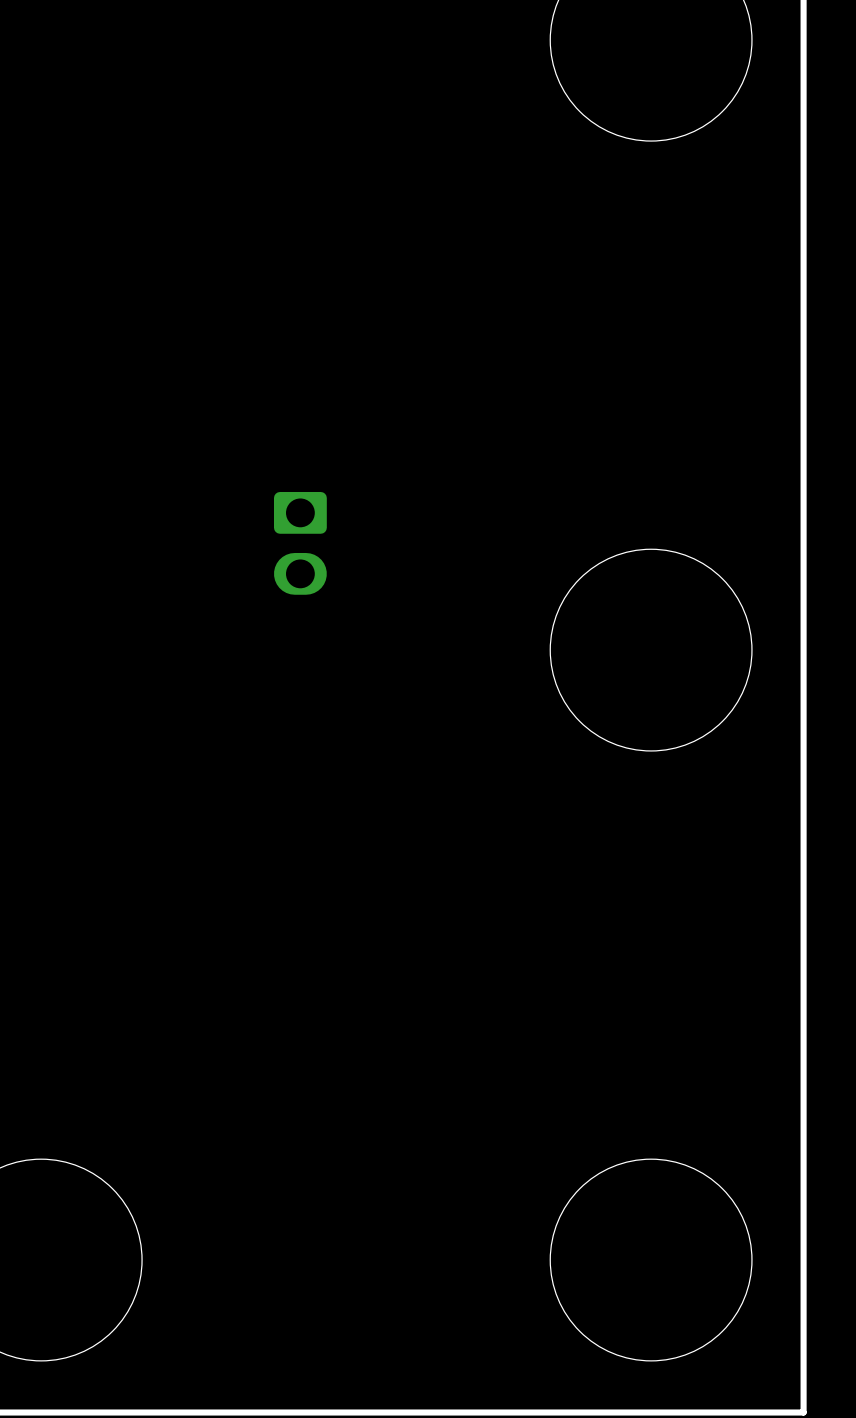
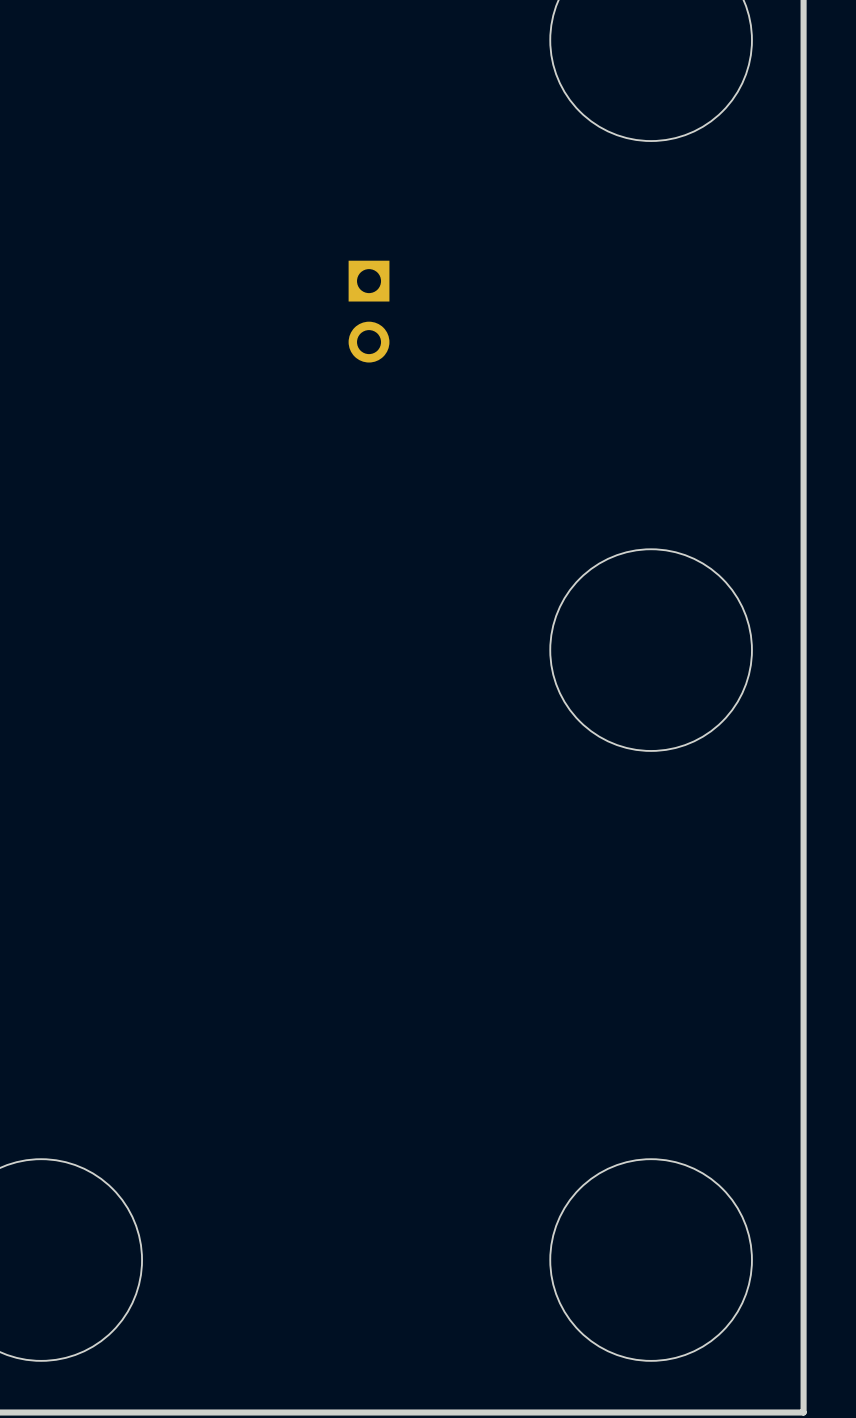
part: none -> (369, 311)
part: (300, 543) -> none

